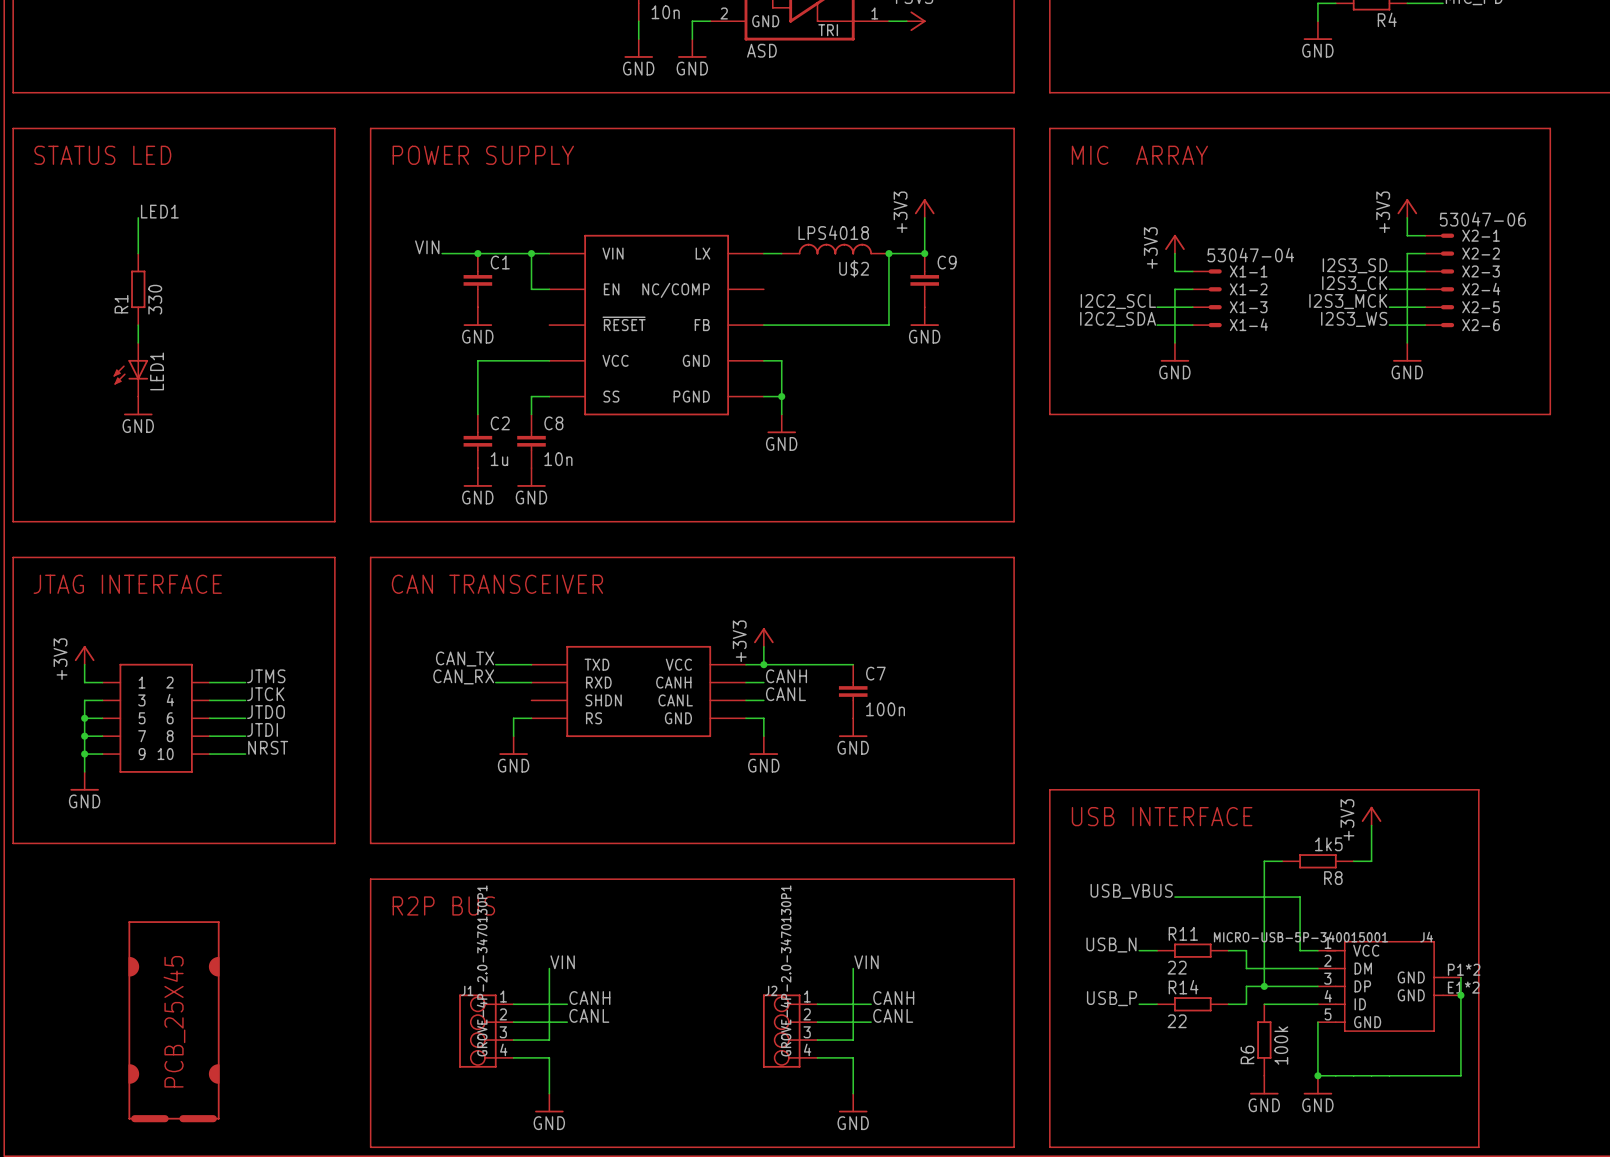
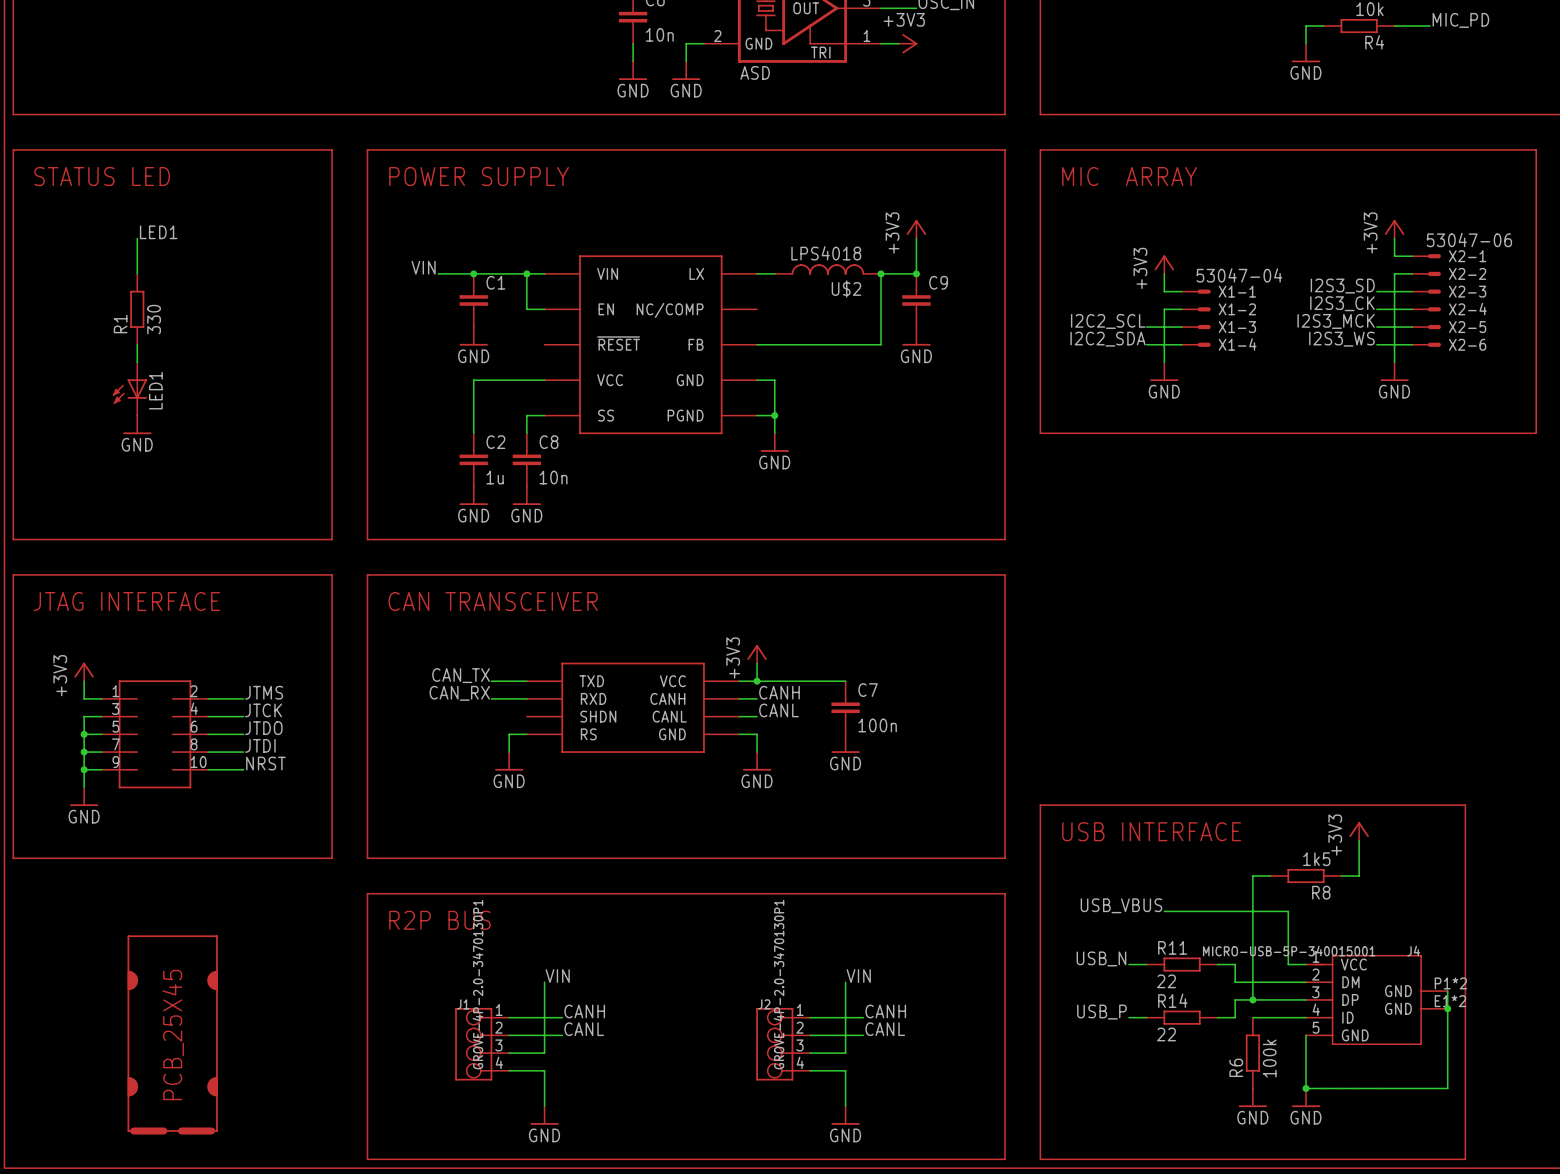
part symbol: [102, 663, 210, 773] -> [101, 680, 209, 789]

